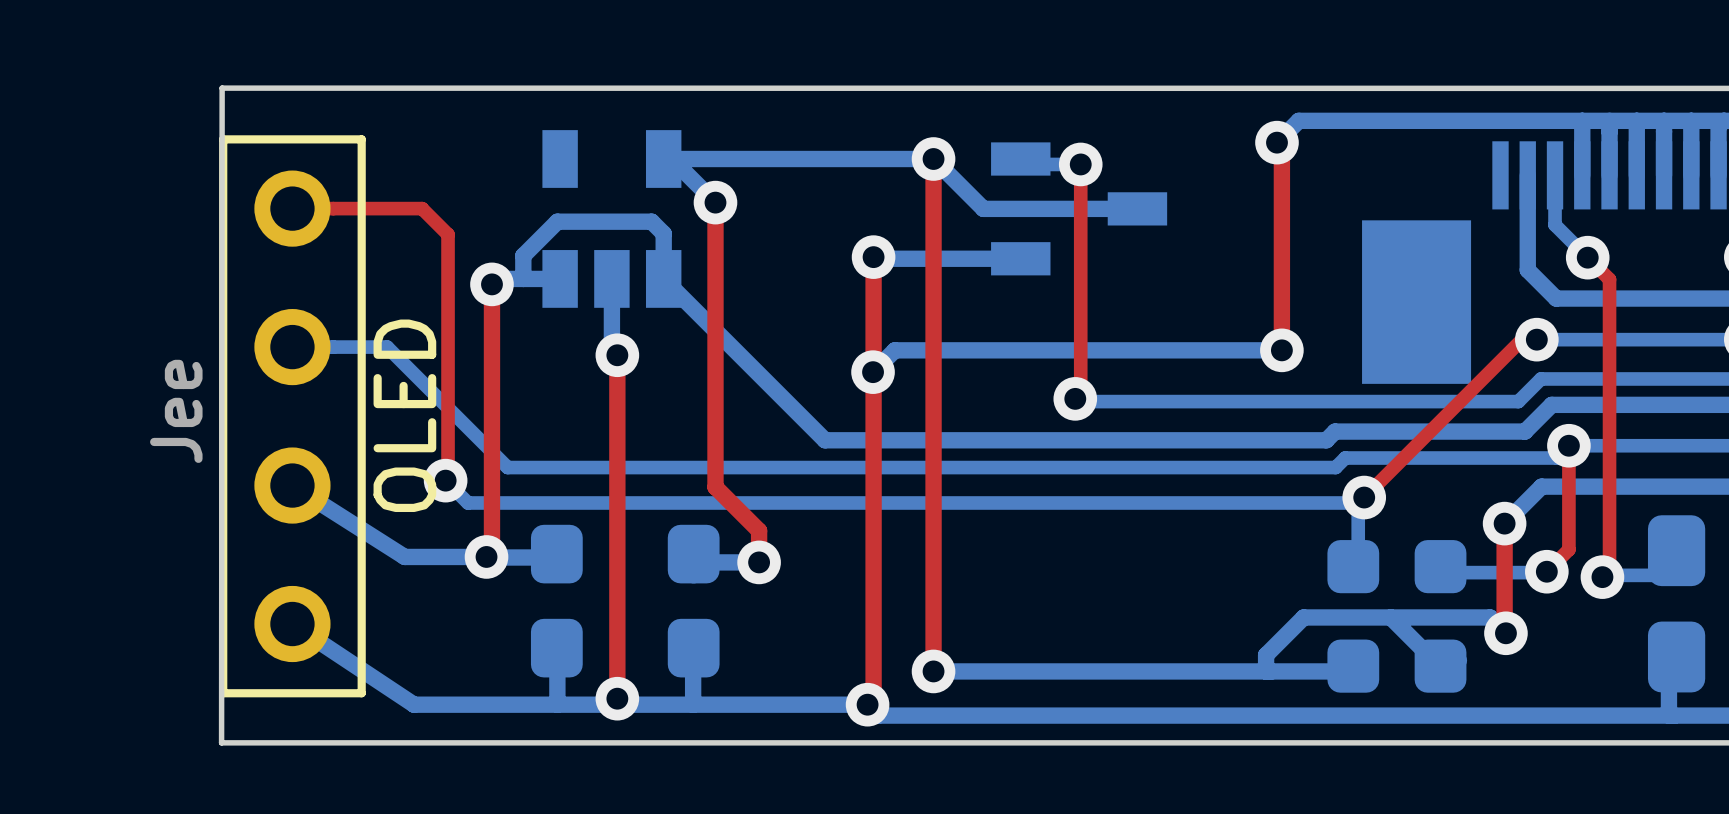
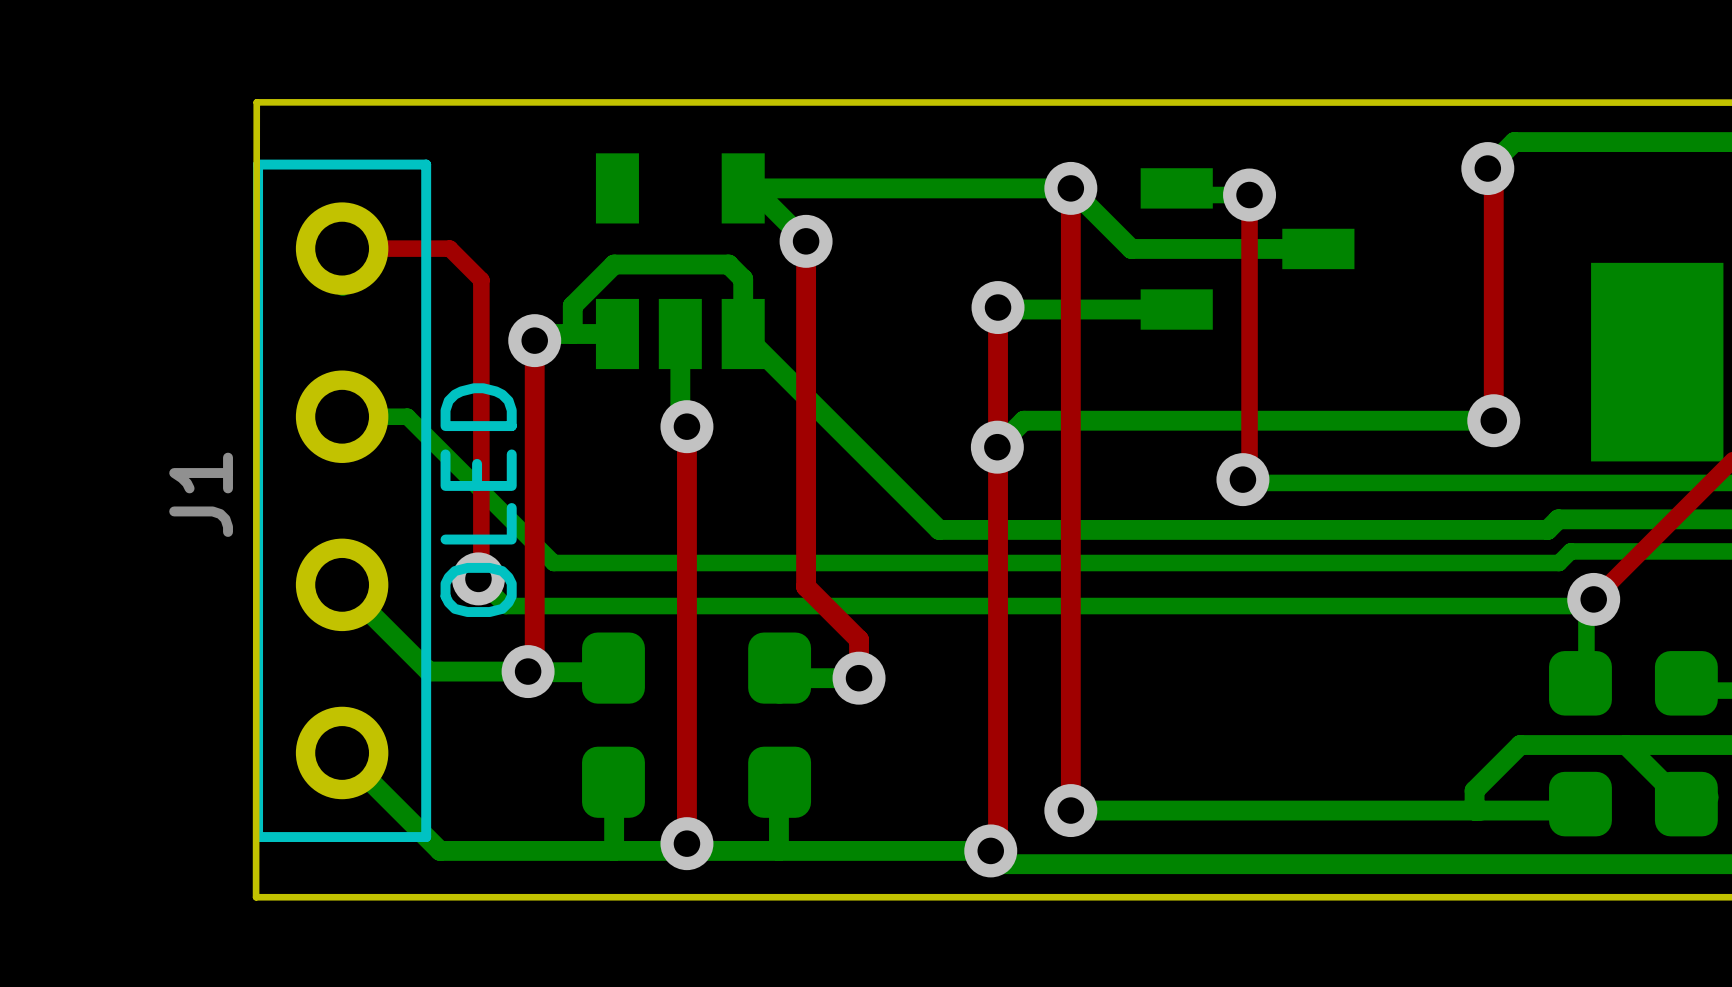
board edge: (263, 88) (222, 88) (221, 742) (262, 742) -> (256, 102) (256, 897)
Jee name: Jee (176, 411) -> J1 (201, 494)
Jee position: (292, 416) -> (342, 500)
bottom track: (292, 485) (404, 556) -> (342, 584) (428, 671)
bottom track: (292, 624) (414, 704) -> (342, 752) (440, 850)

